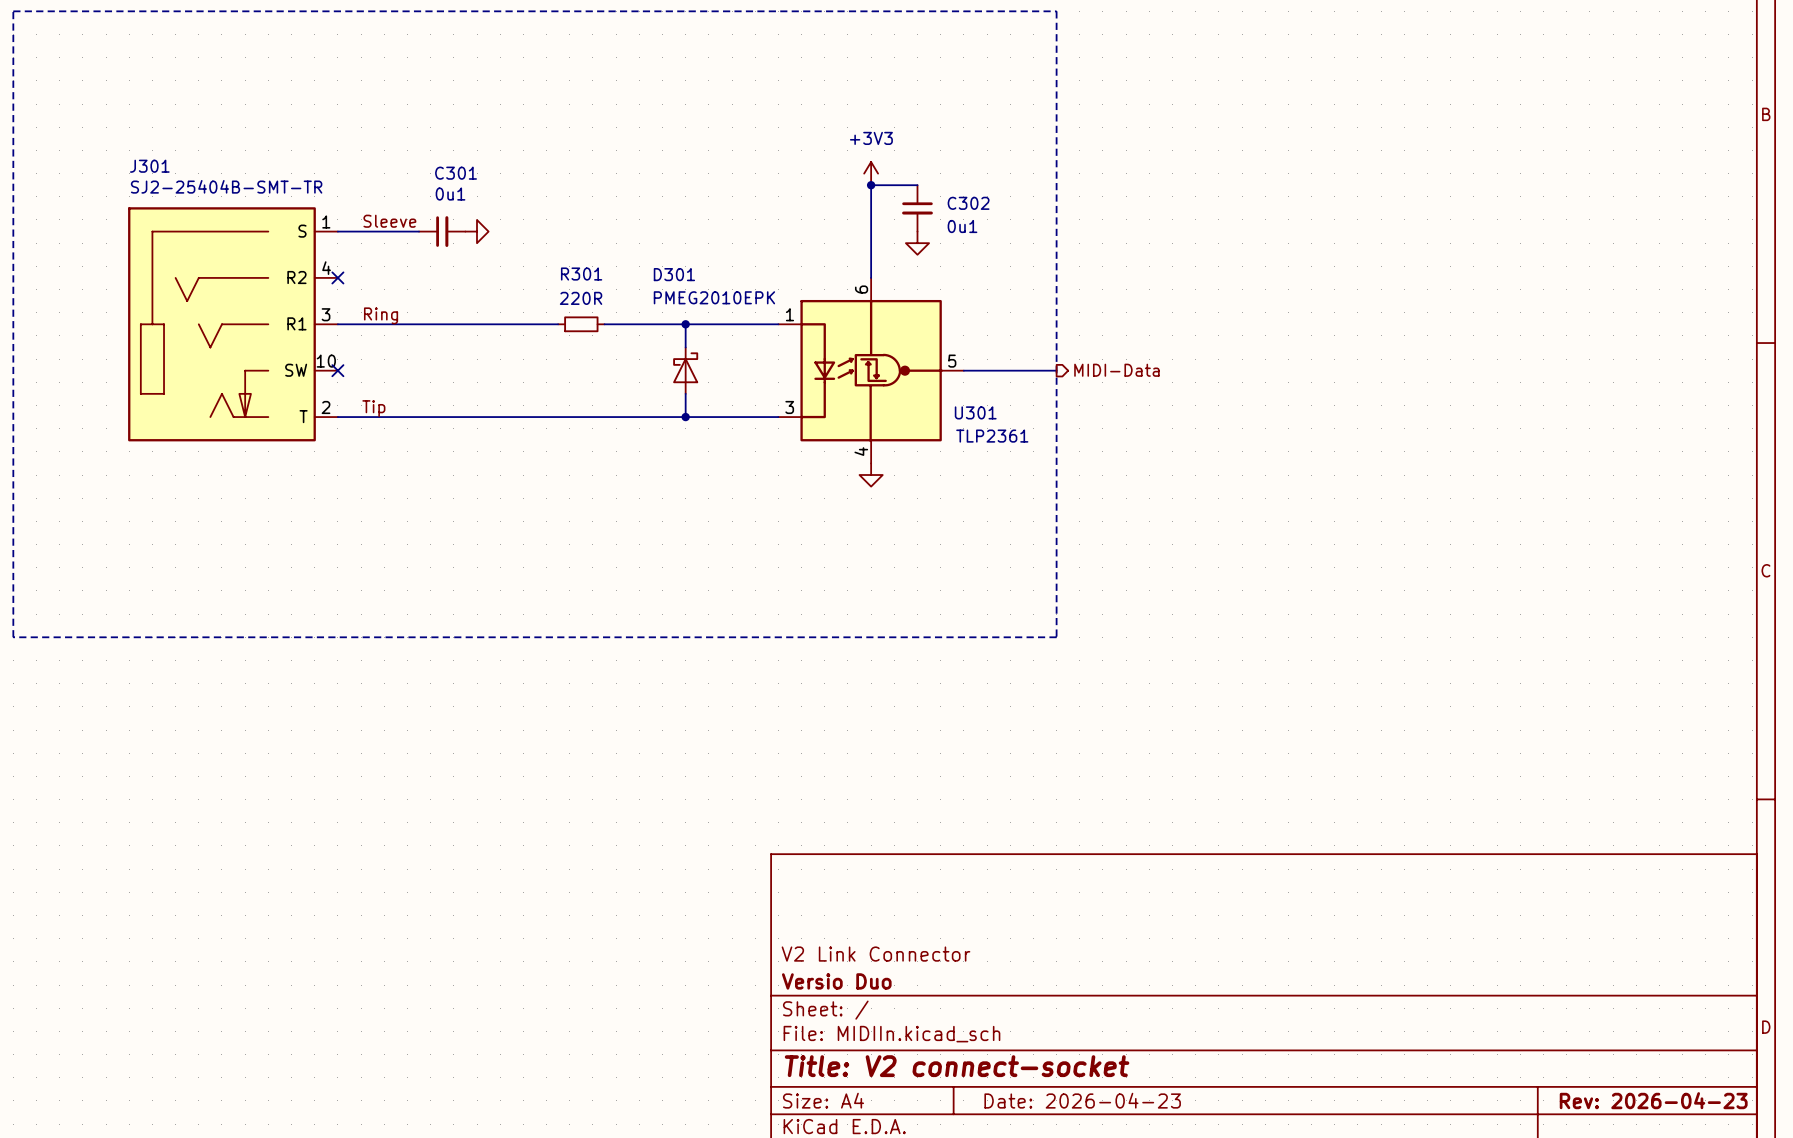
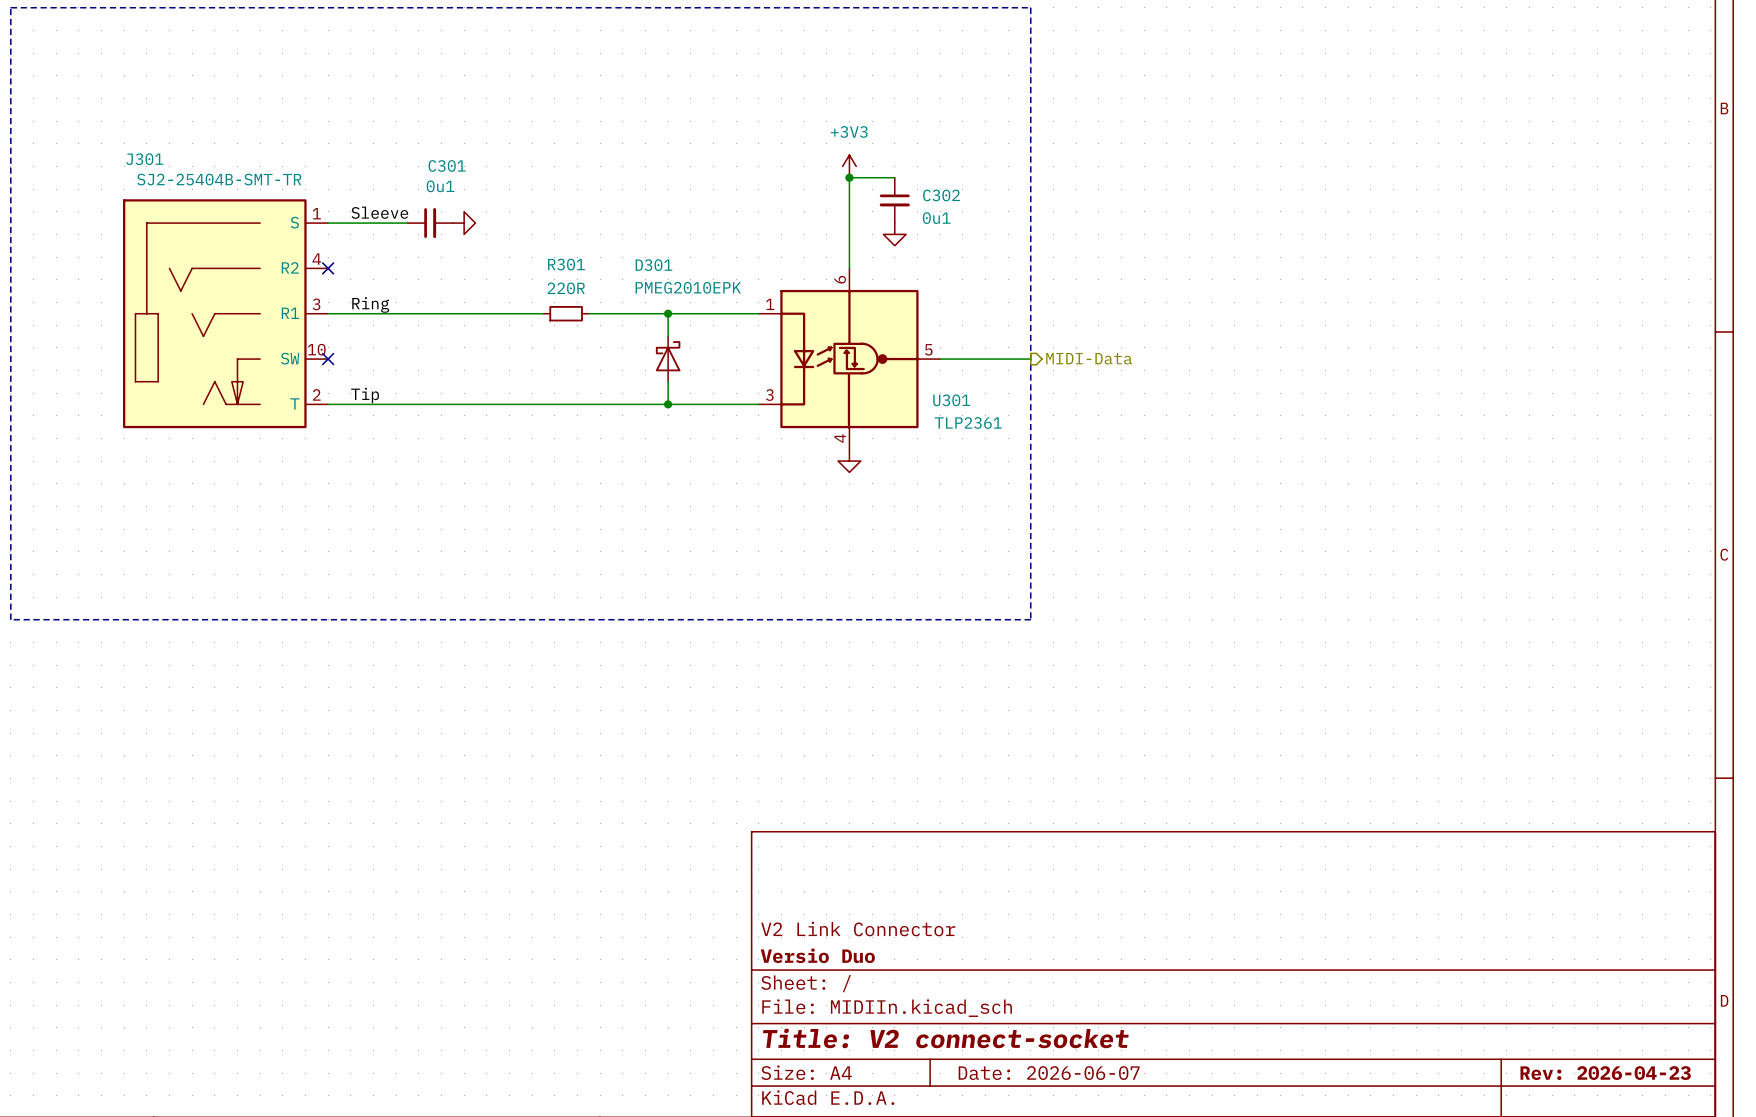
title block: Date: 2026-04-23 (1082, 1100) -> Date: 2026-06-07 (1049, 1073)

